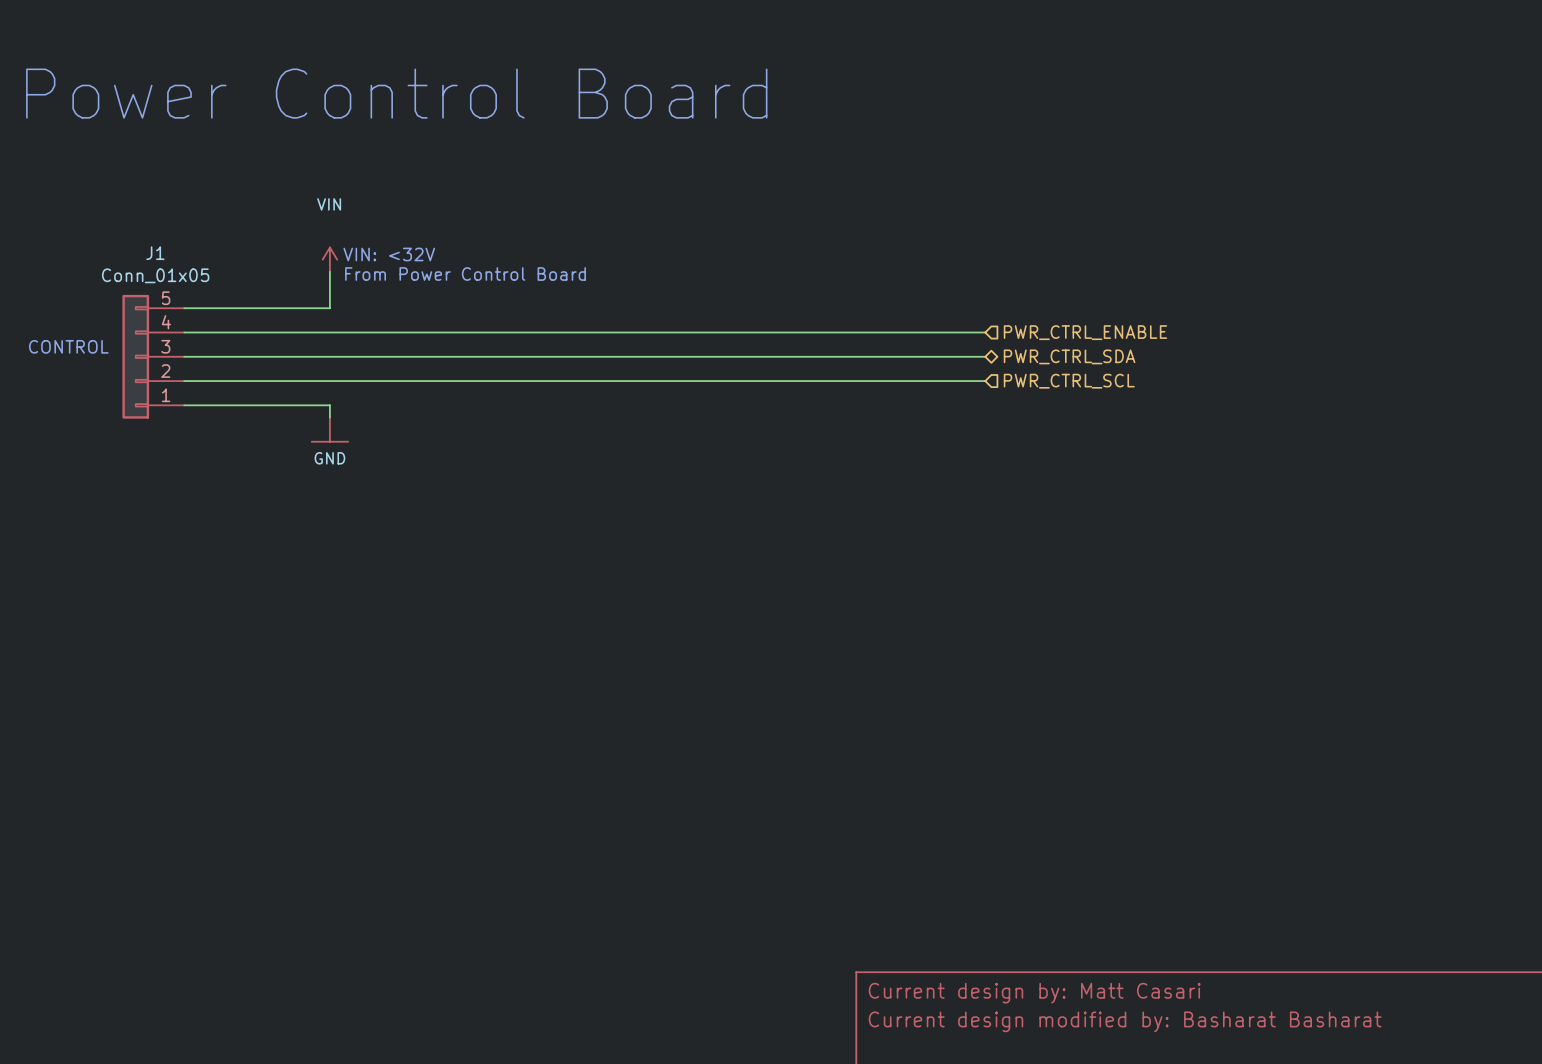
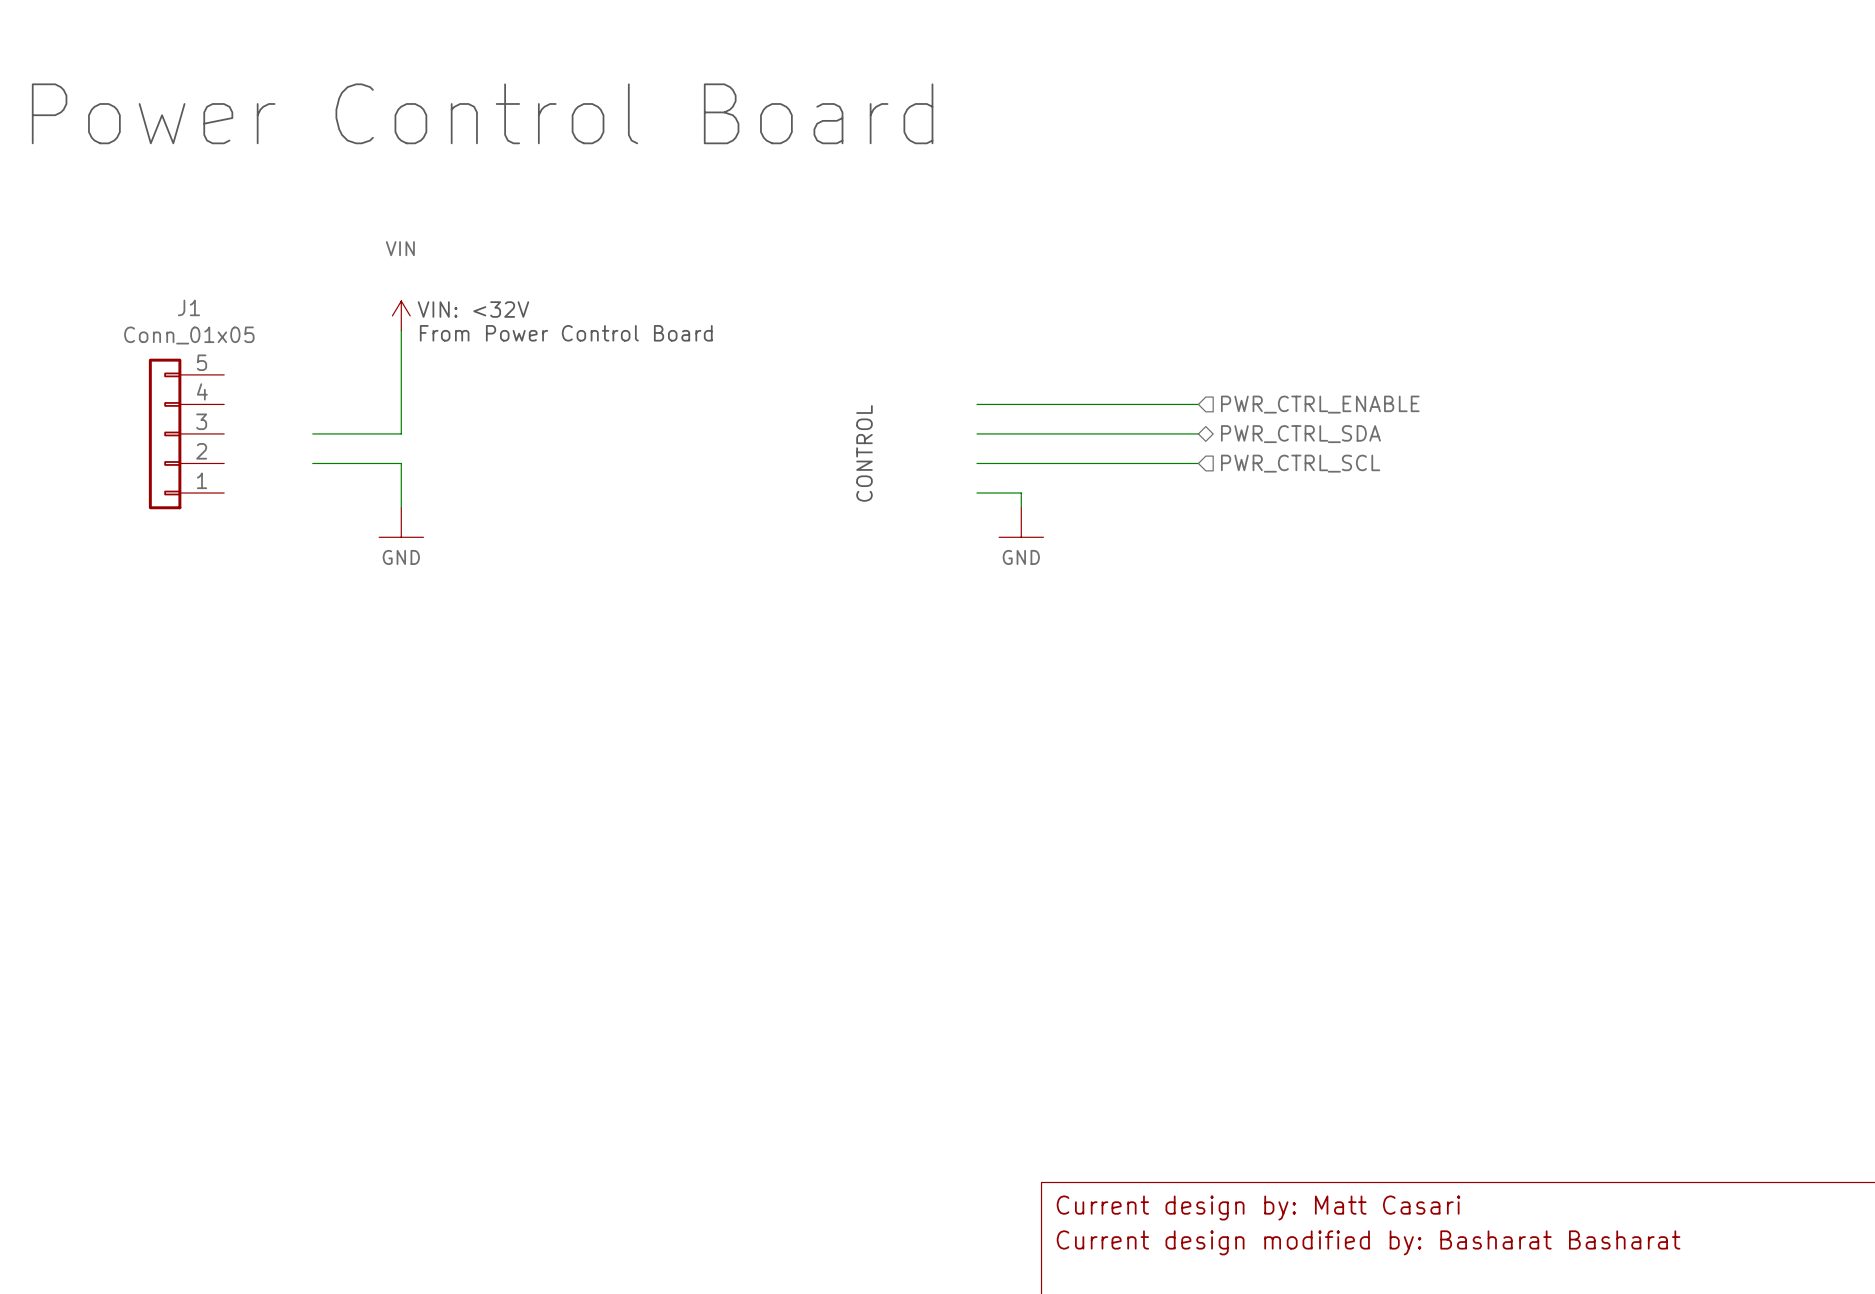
wire: (184, 308) (329, 308) -> (401, 433) (401, 374)
wire: (184, 332) (803, 332) -> none
text: CONTROL (68, 346) -> none
wire: (184, 356) (257, 356) -> none
wire: (329, 356) (803, 356) -> none
text: none -> CONTROL (864, 453)
wire: (184, 381) (257, 381) -> none
wire: (329, 381) (803, 381) -> none
wire: (184, 405) (329, 405) -> (401, 463) (401, 493)
wire: none -> (977, 493) (1021, 493) (1021, 507)
power symbol: none -> GND (1021, 522)

